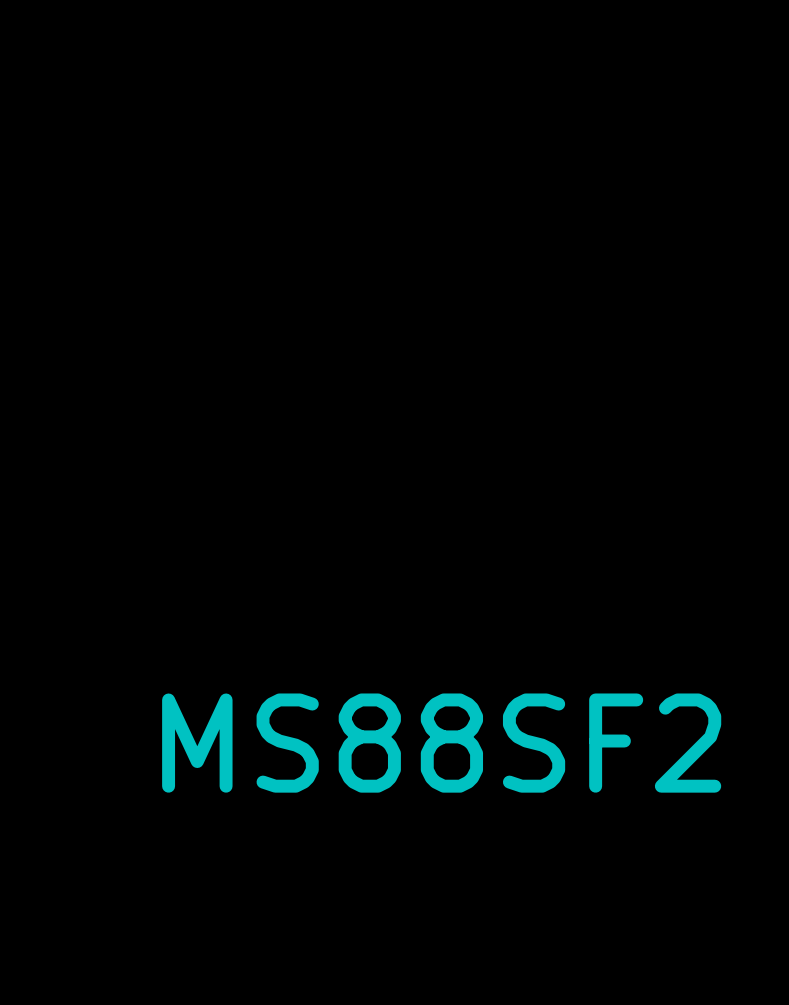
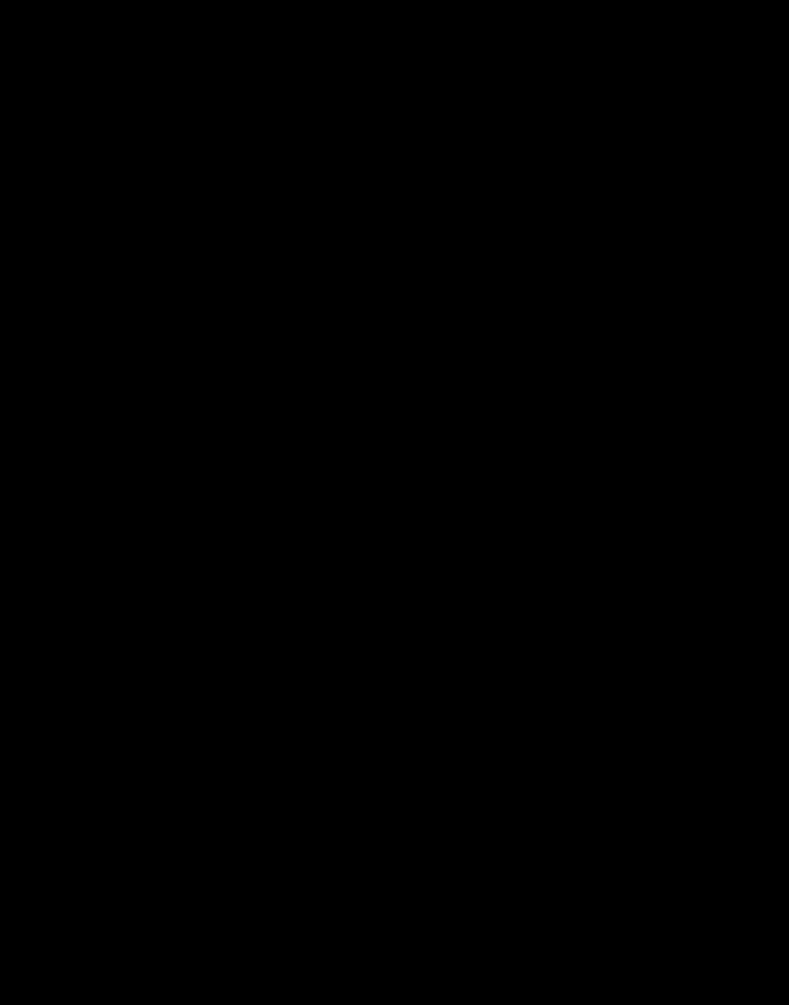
text: MS88SF2 (441, 743) -> none

